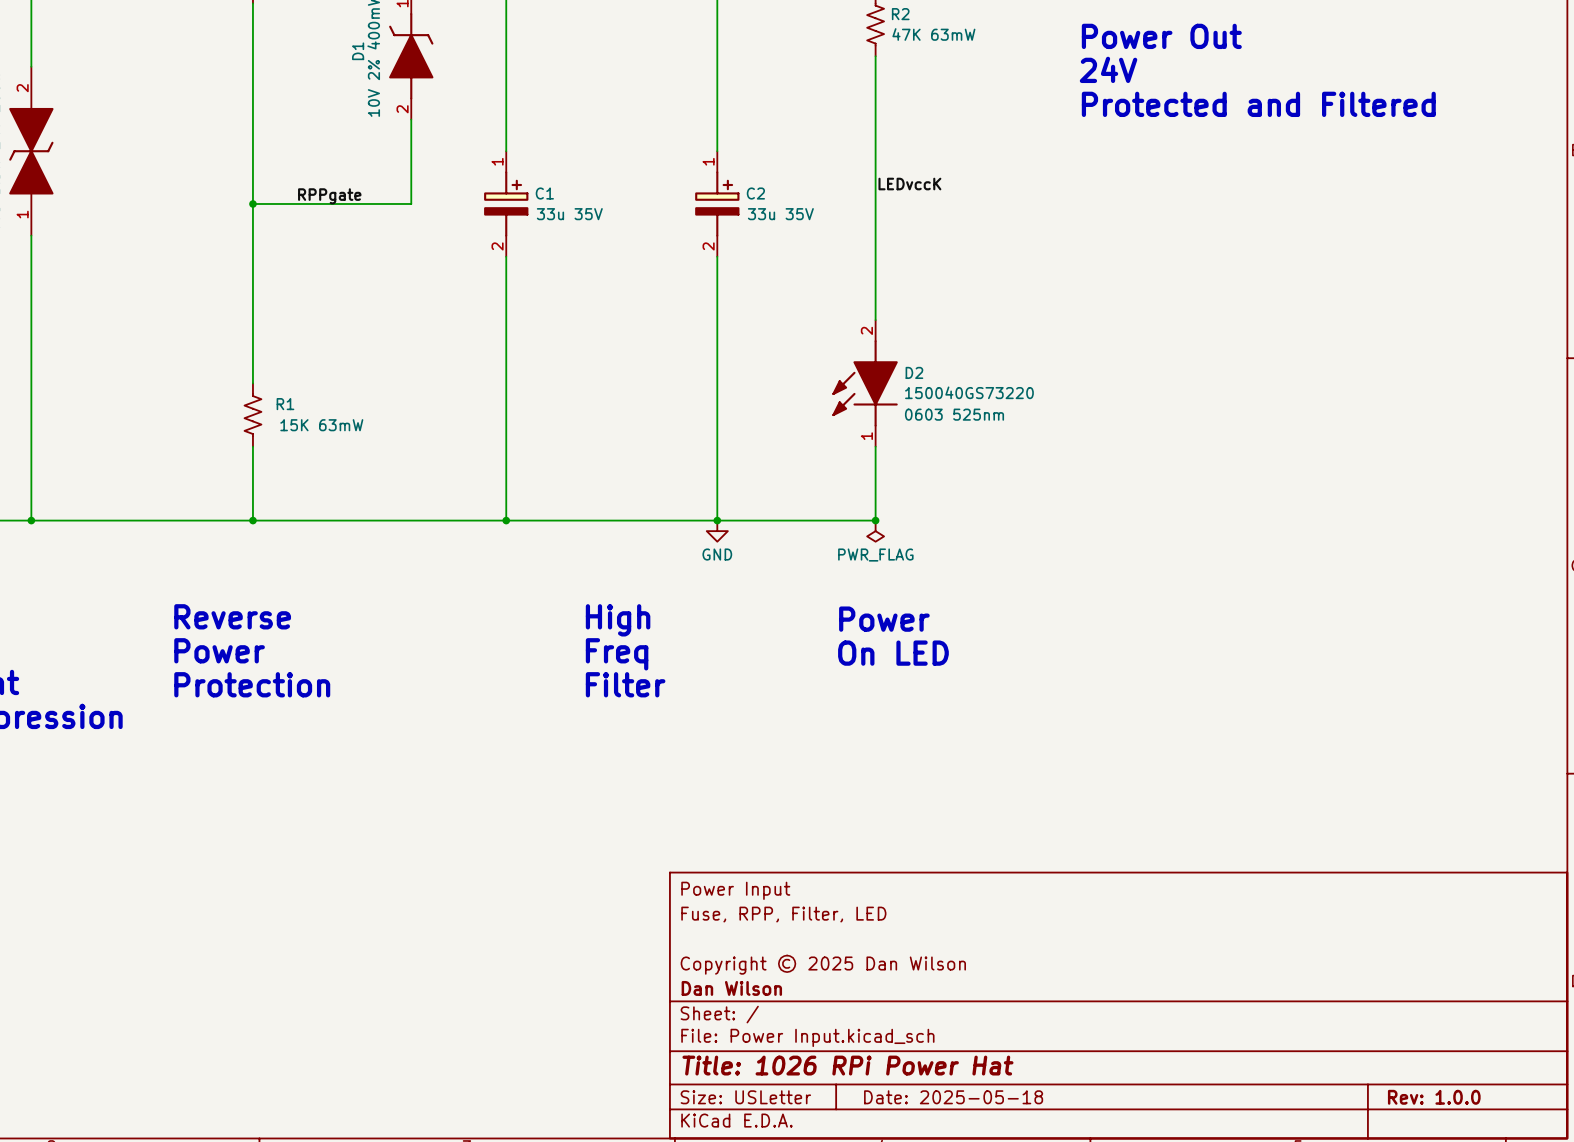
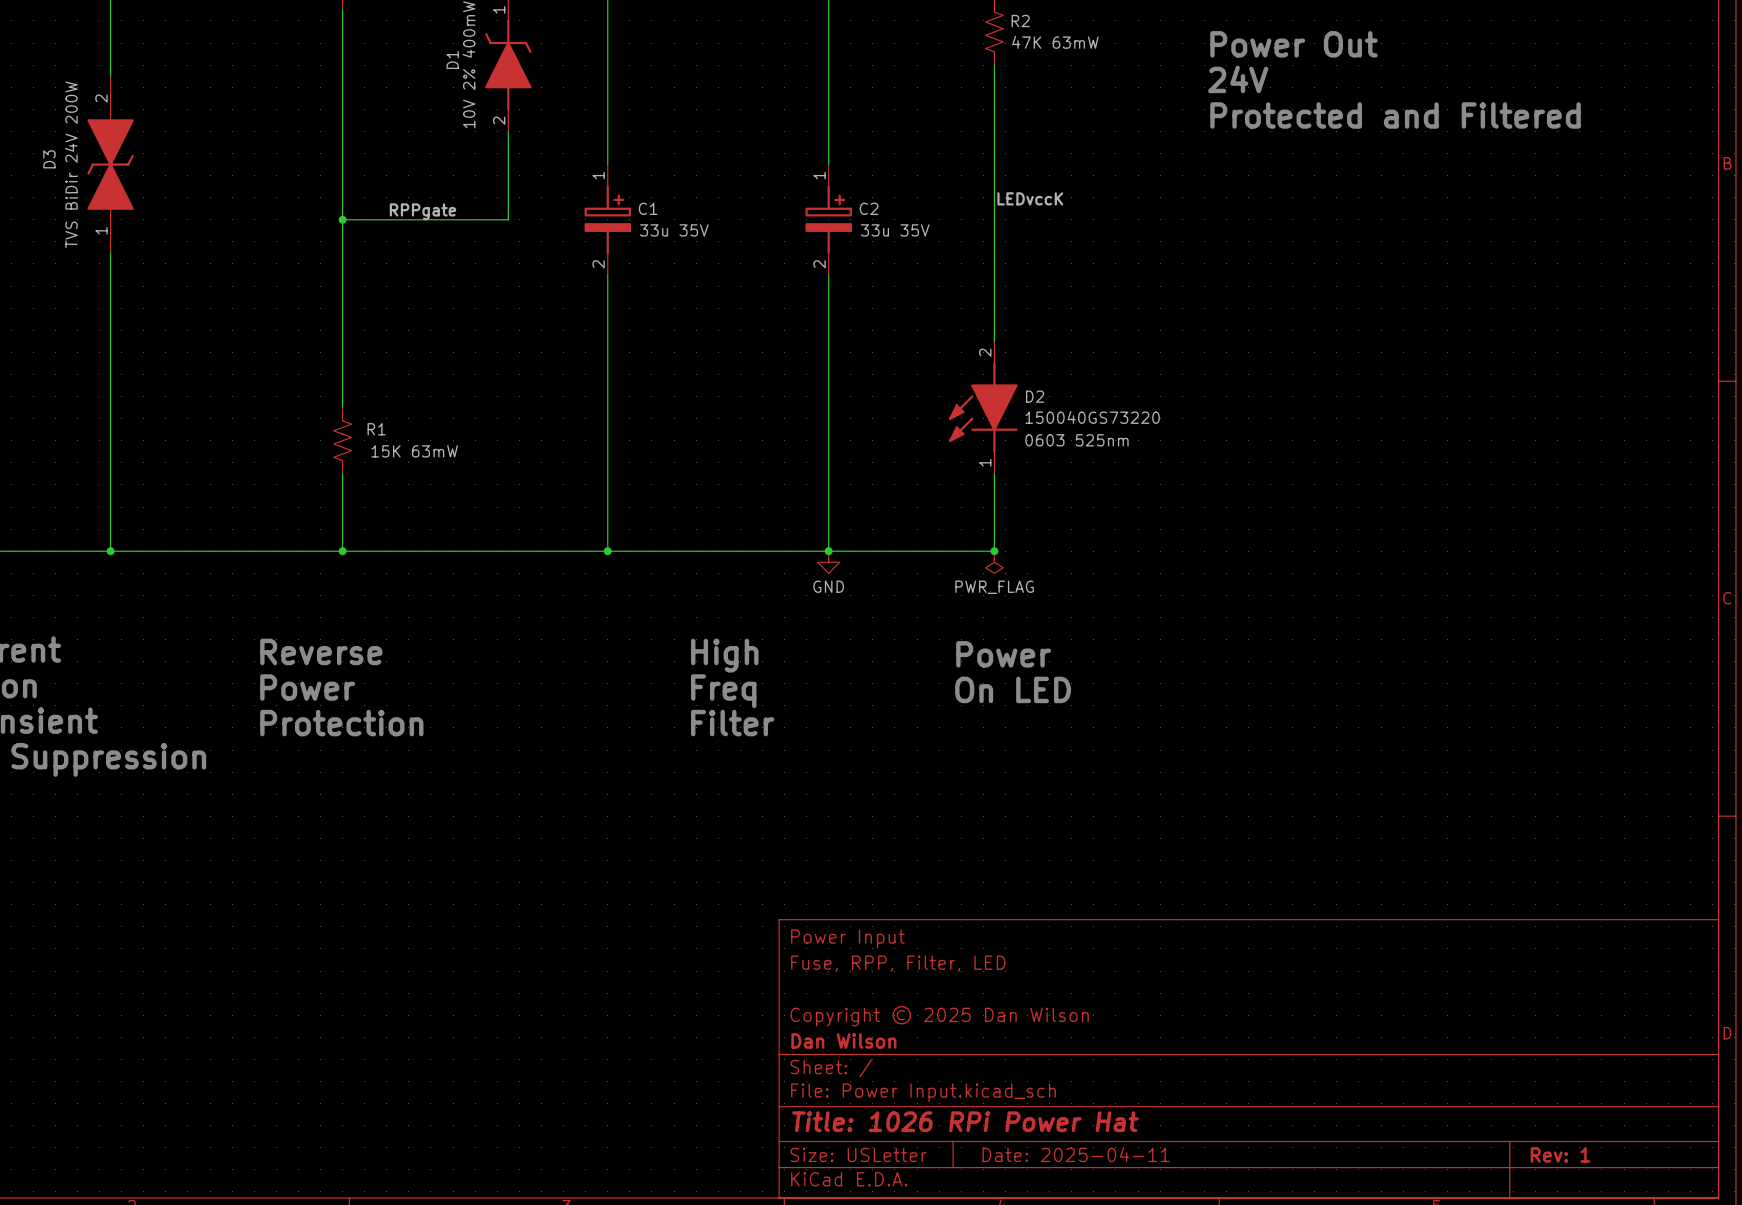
title block: Date: 2025-05-18 (953, 1097) -> Date: 2025-04-11 (1076, 1154)
title block: Rev: 1.0.0 (1434, 1097) -> Rev: 1 (1560, 1154)

